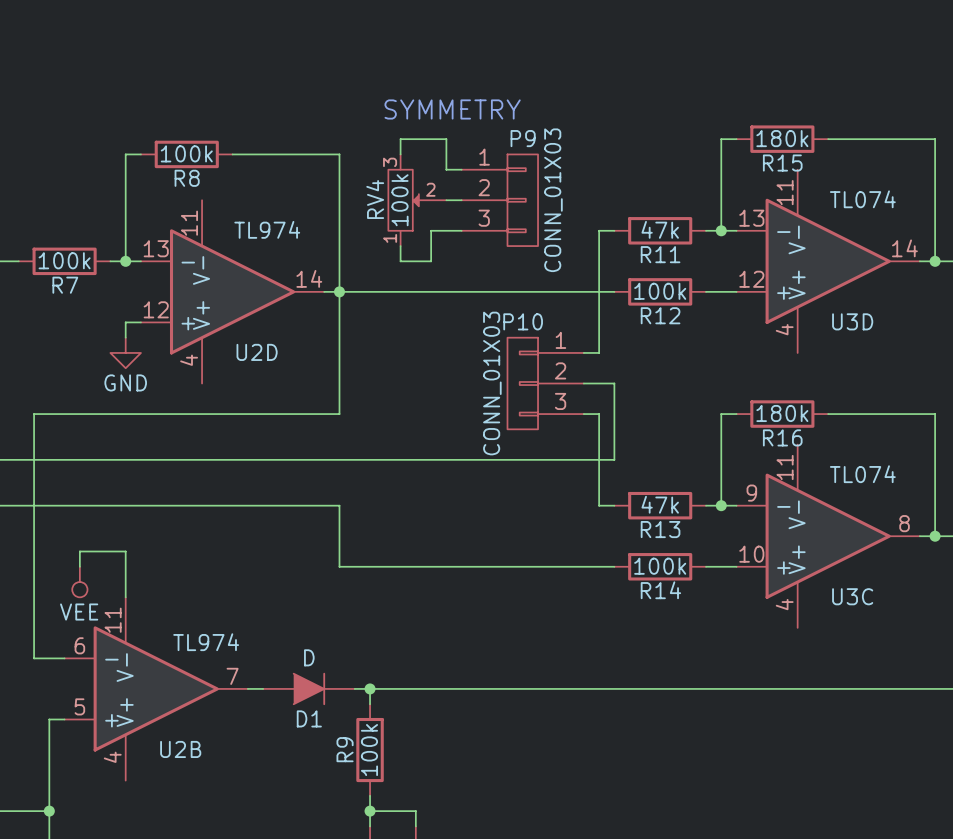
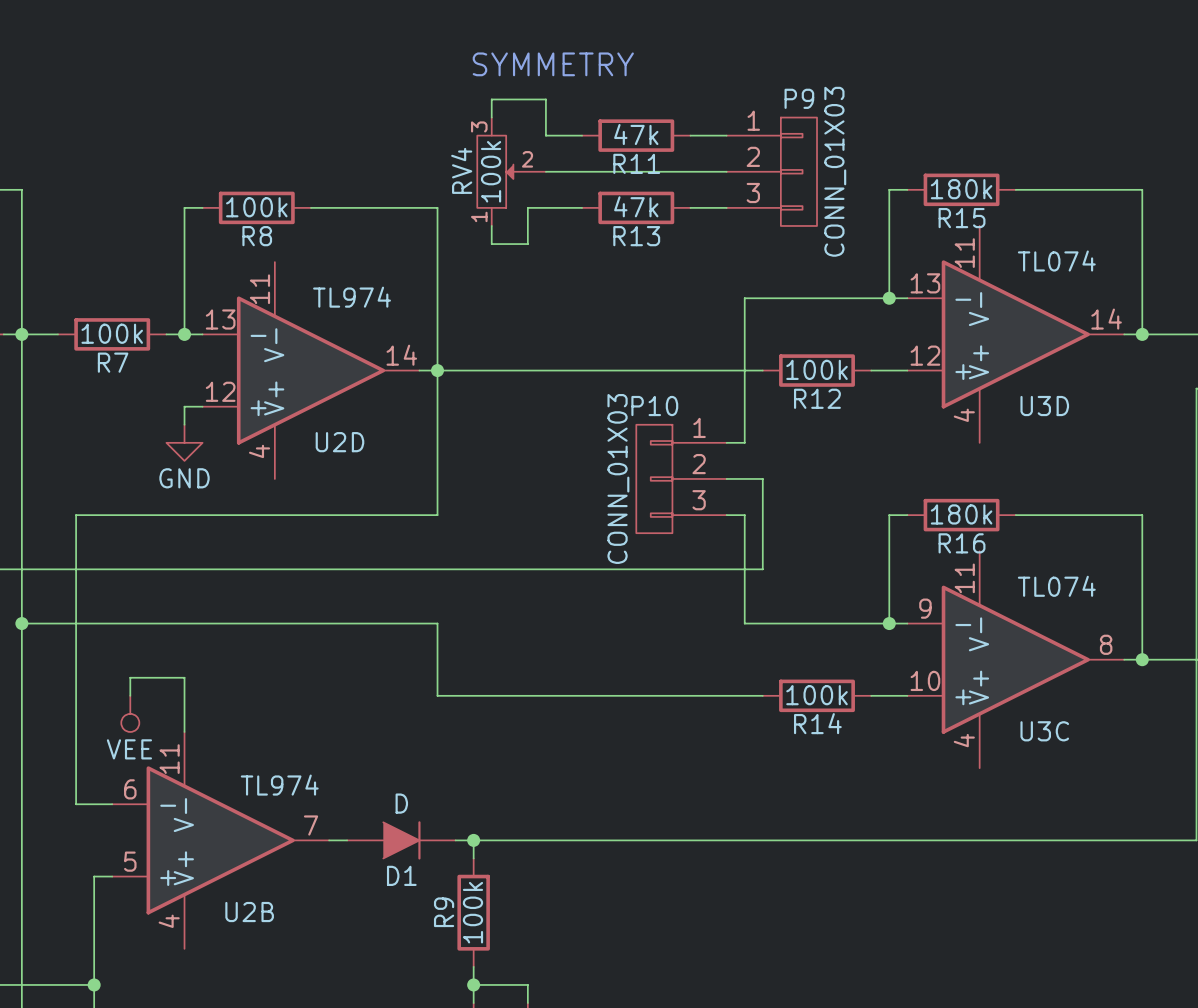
wire: none -> (491, 117) (491, 99) (545, 99) (545, 135) (582, 135)
wire: none -> (690, 135) (726, 135)
text position: SYMMETRY (452, 109) -> SYMMETRY (553, 64)
wire: none -> (545, 171) (726, 171)
wire: (400, 154) (400, 139) (446, 139) (446, 169) (461, 169) -> none
wire: none -> (582, 207) (527, 207) (527, 244) (491, 244) (491, 225)
wire: none -> (690, 207) (726, 207)
RV4 position: (417, 200) -> (511, 171)
wire: (446, 200) (461, 200) -> none
P9 position: (499, 200) -> (771, 171)
wire: (461, 230) (431, 230) (431, 261) (400, 261) (400, 246) -> none
wire: none -> (762, 298) (871, 298)
R11 position: (660, 230) -> (636, 135)
wire: none -> (762, 623) (871, 623)
R13 position: (660, 505) -> (636, 207)

